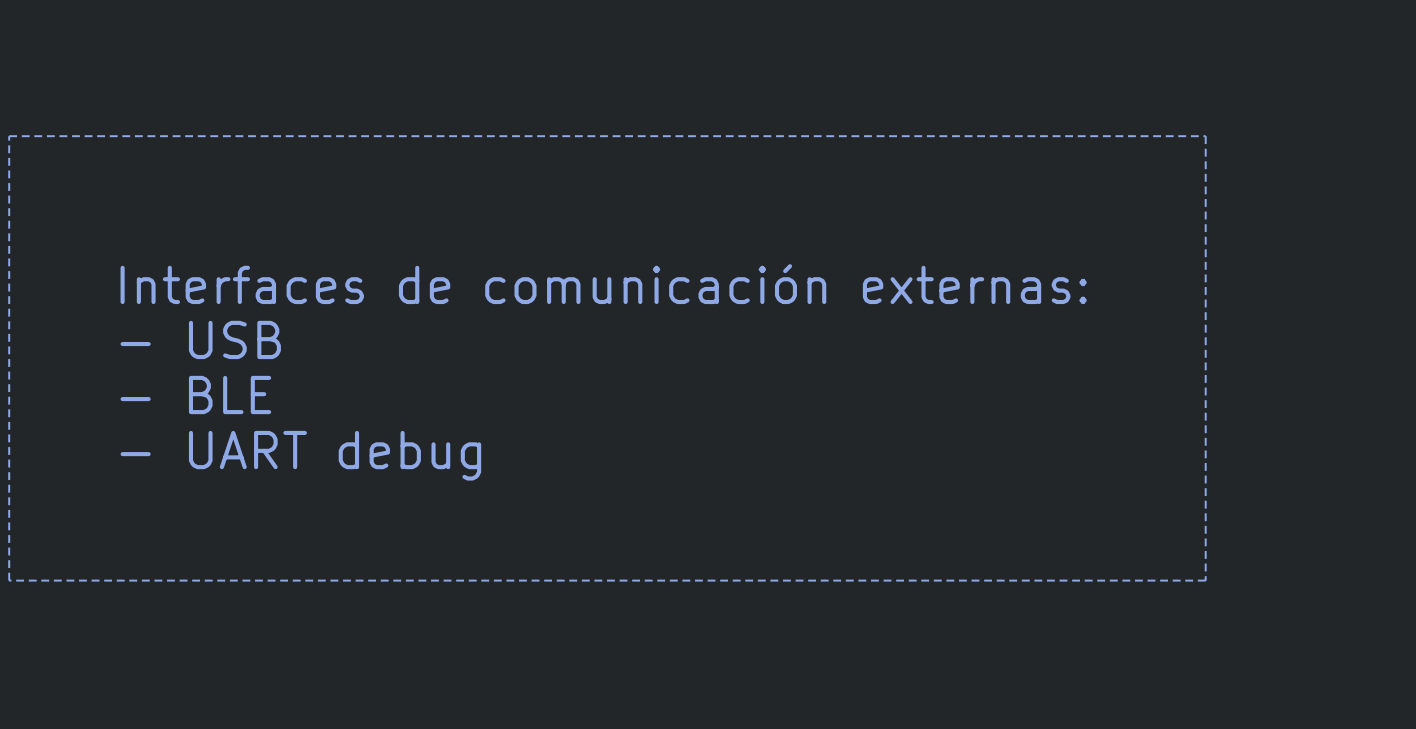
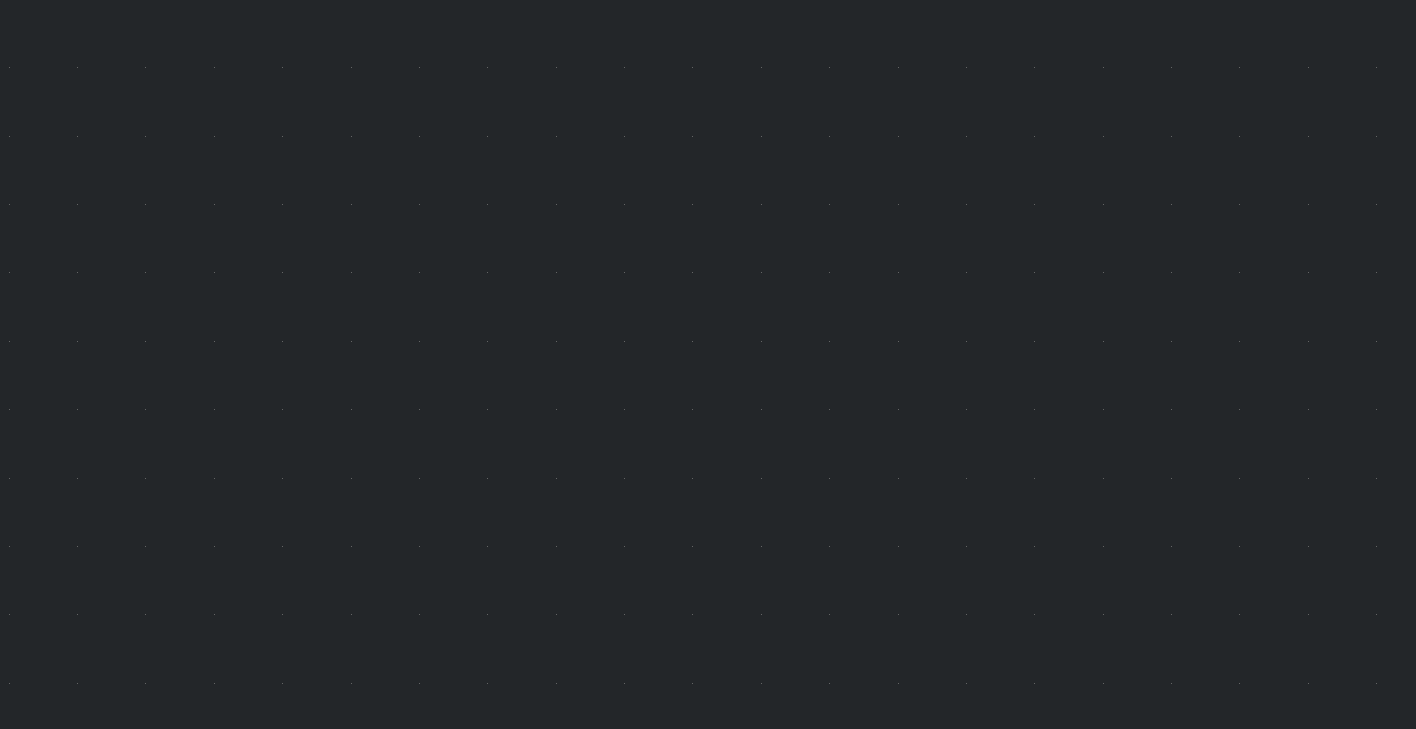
line: (9, 136) (1205, 136) (1205, 580) (9, 580) (9, 136) -> none
text: Interfaces de comunicación externas: (603, 284) -> none
text: - USB (200, 339) -> none
text: - BLE (195, 395) -> none
text: - UART debug (300, 455) -> none

